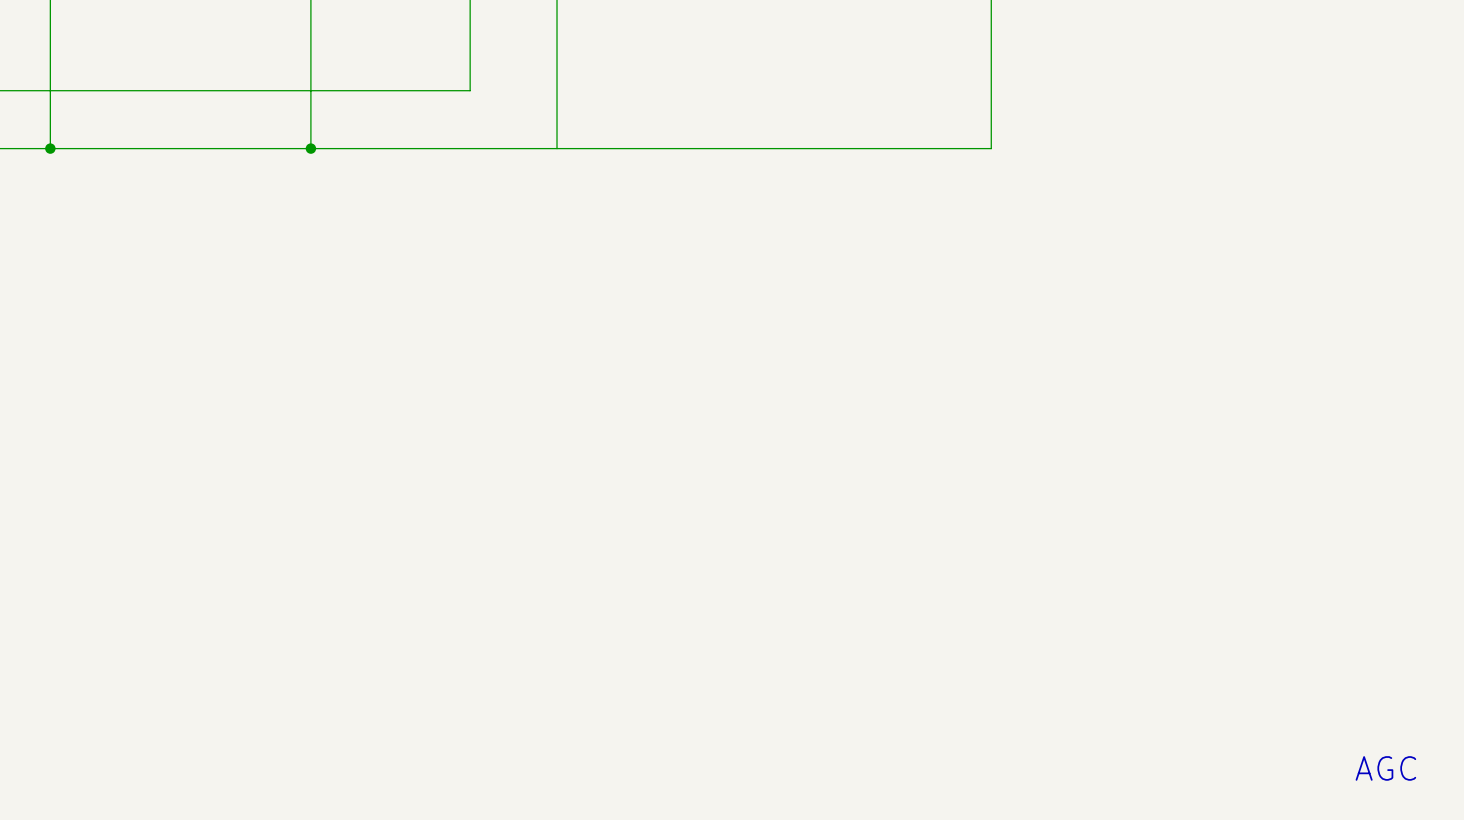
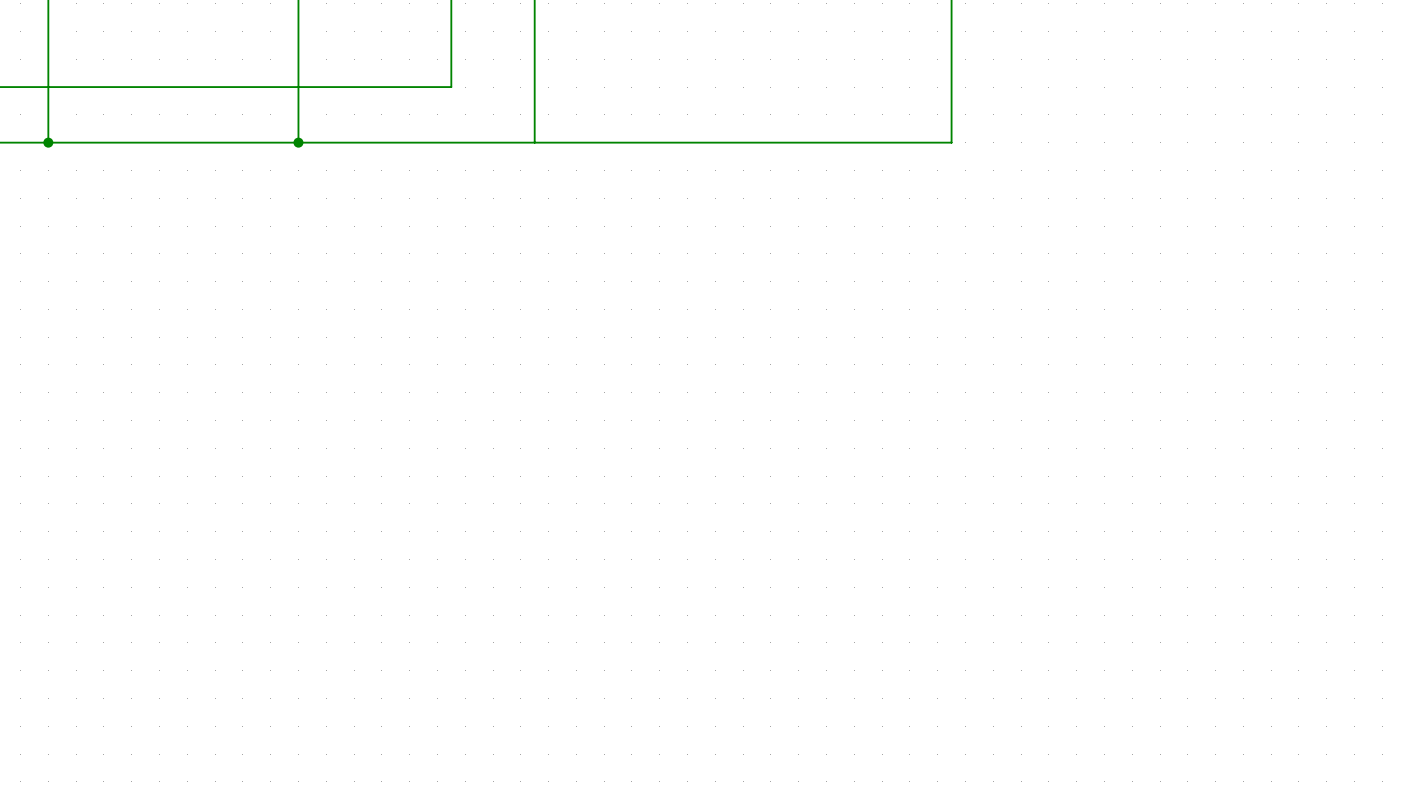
text: AGC (1385, 768) -> none

